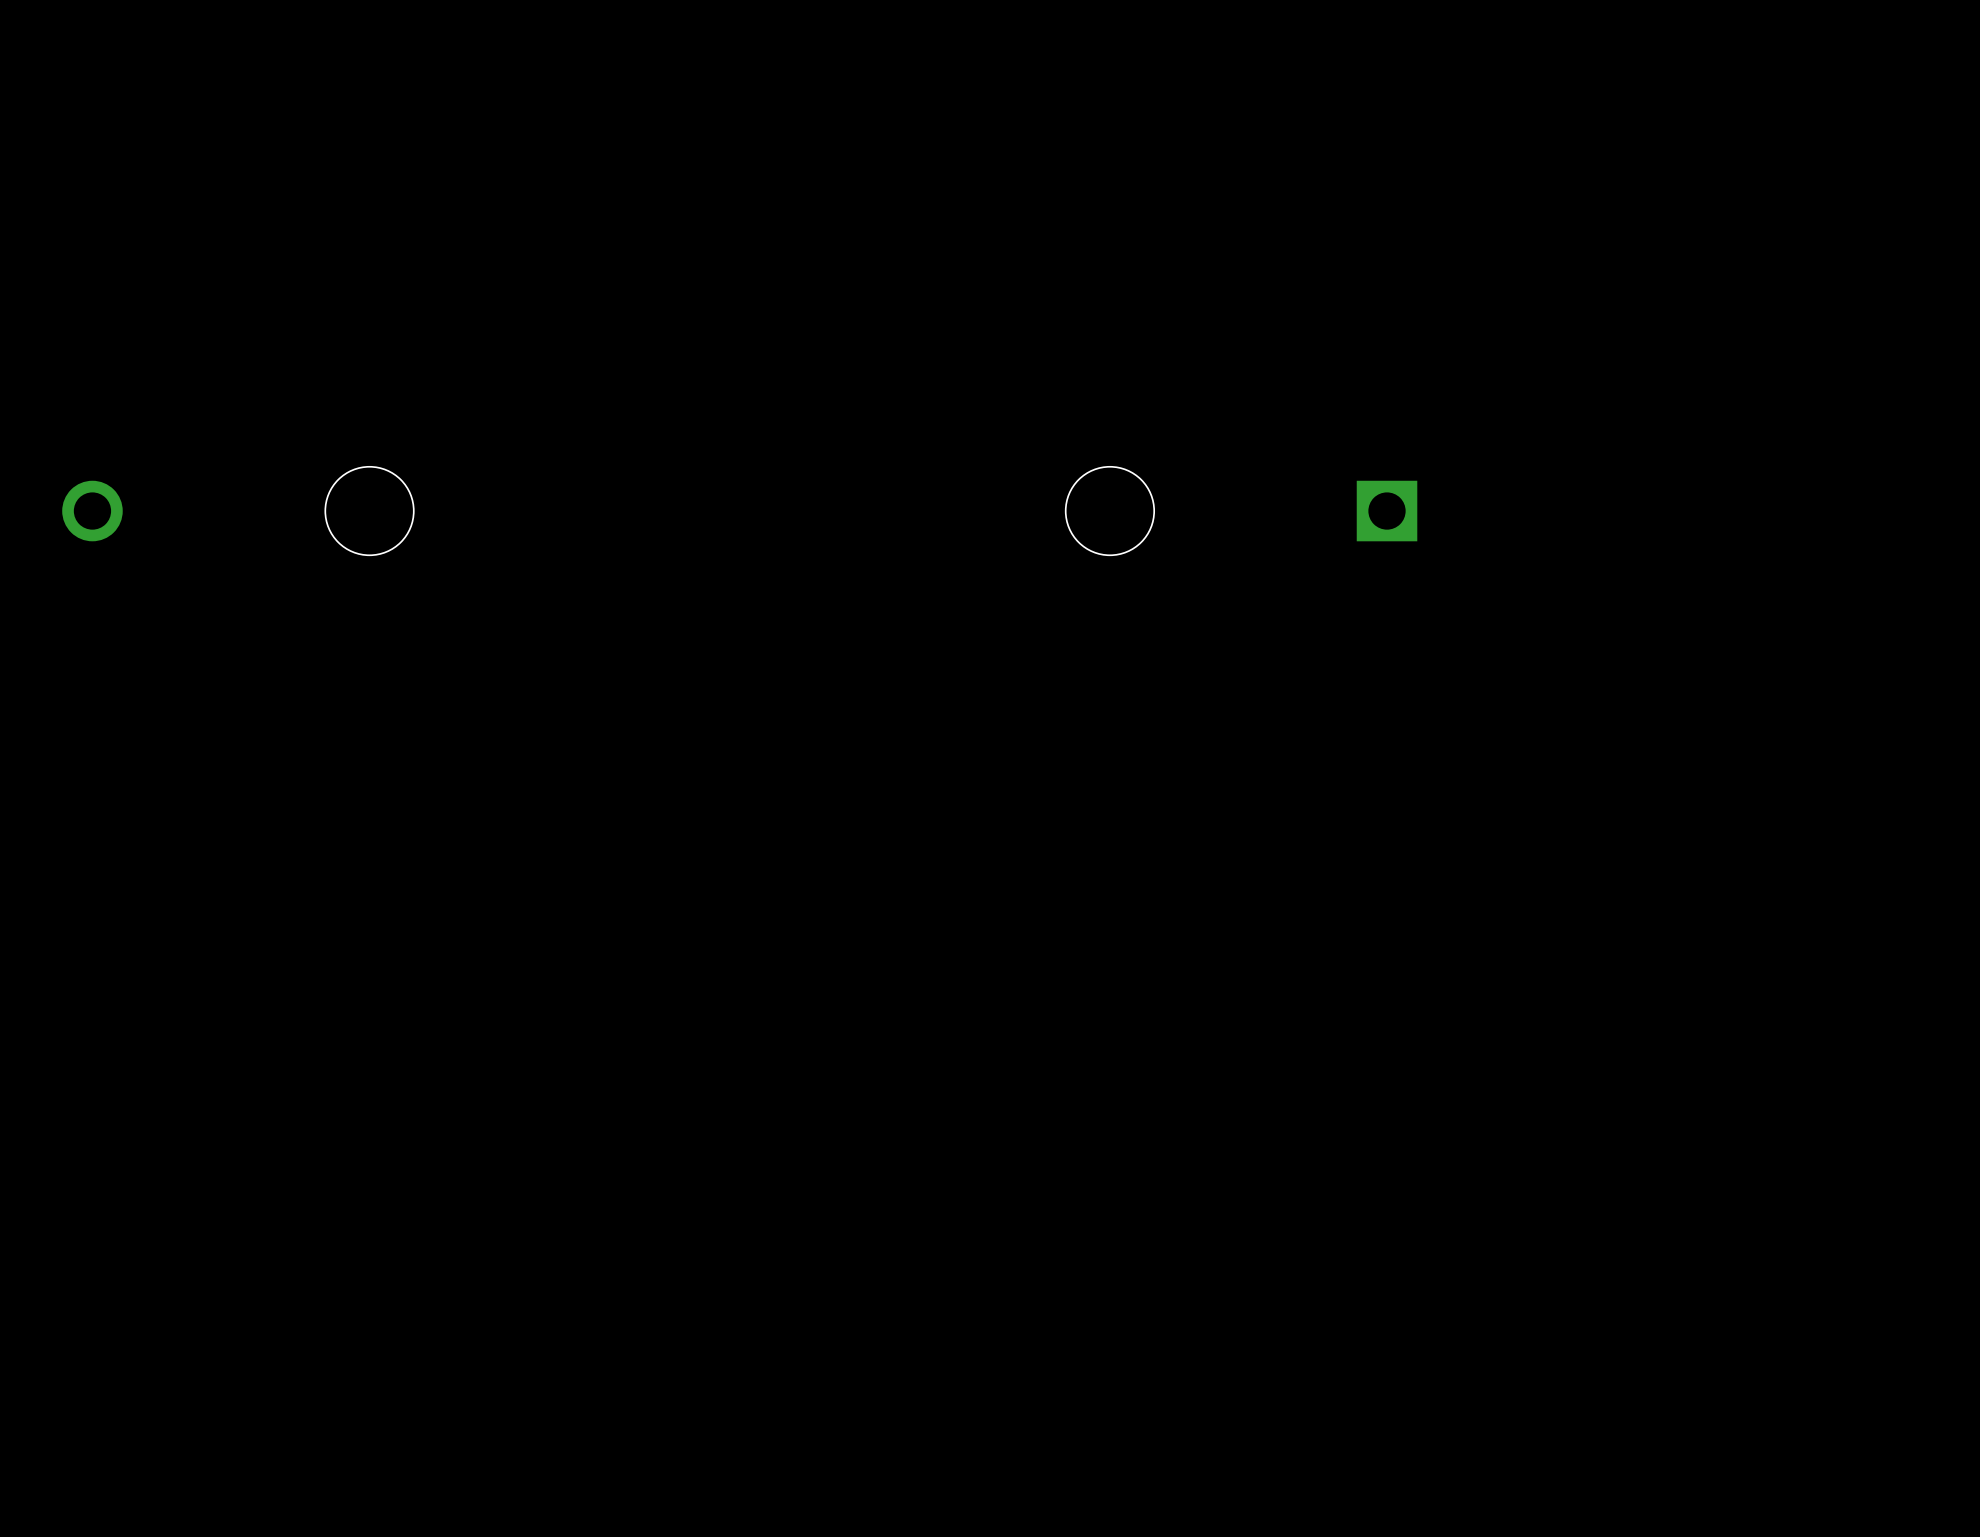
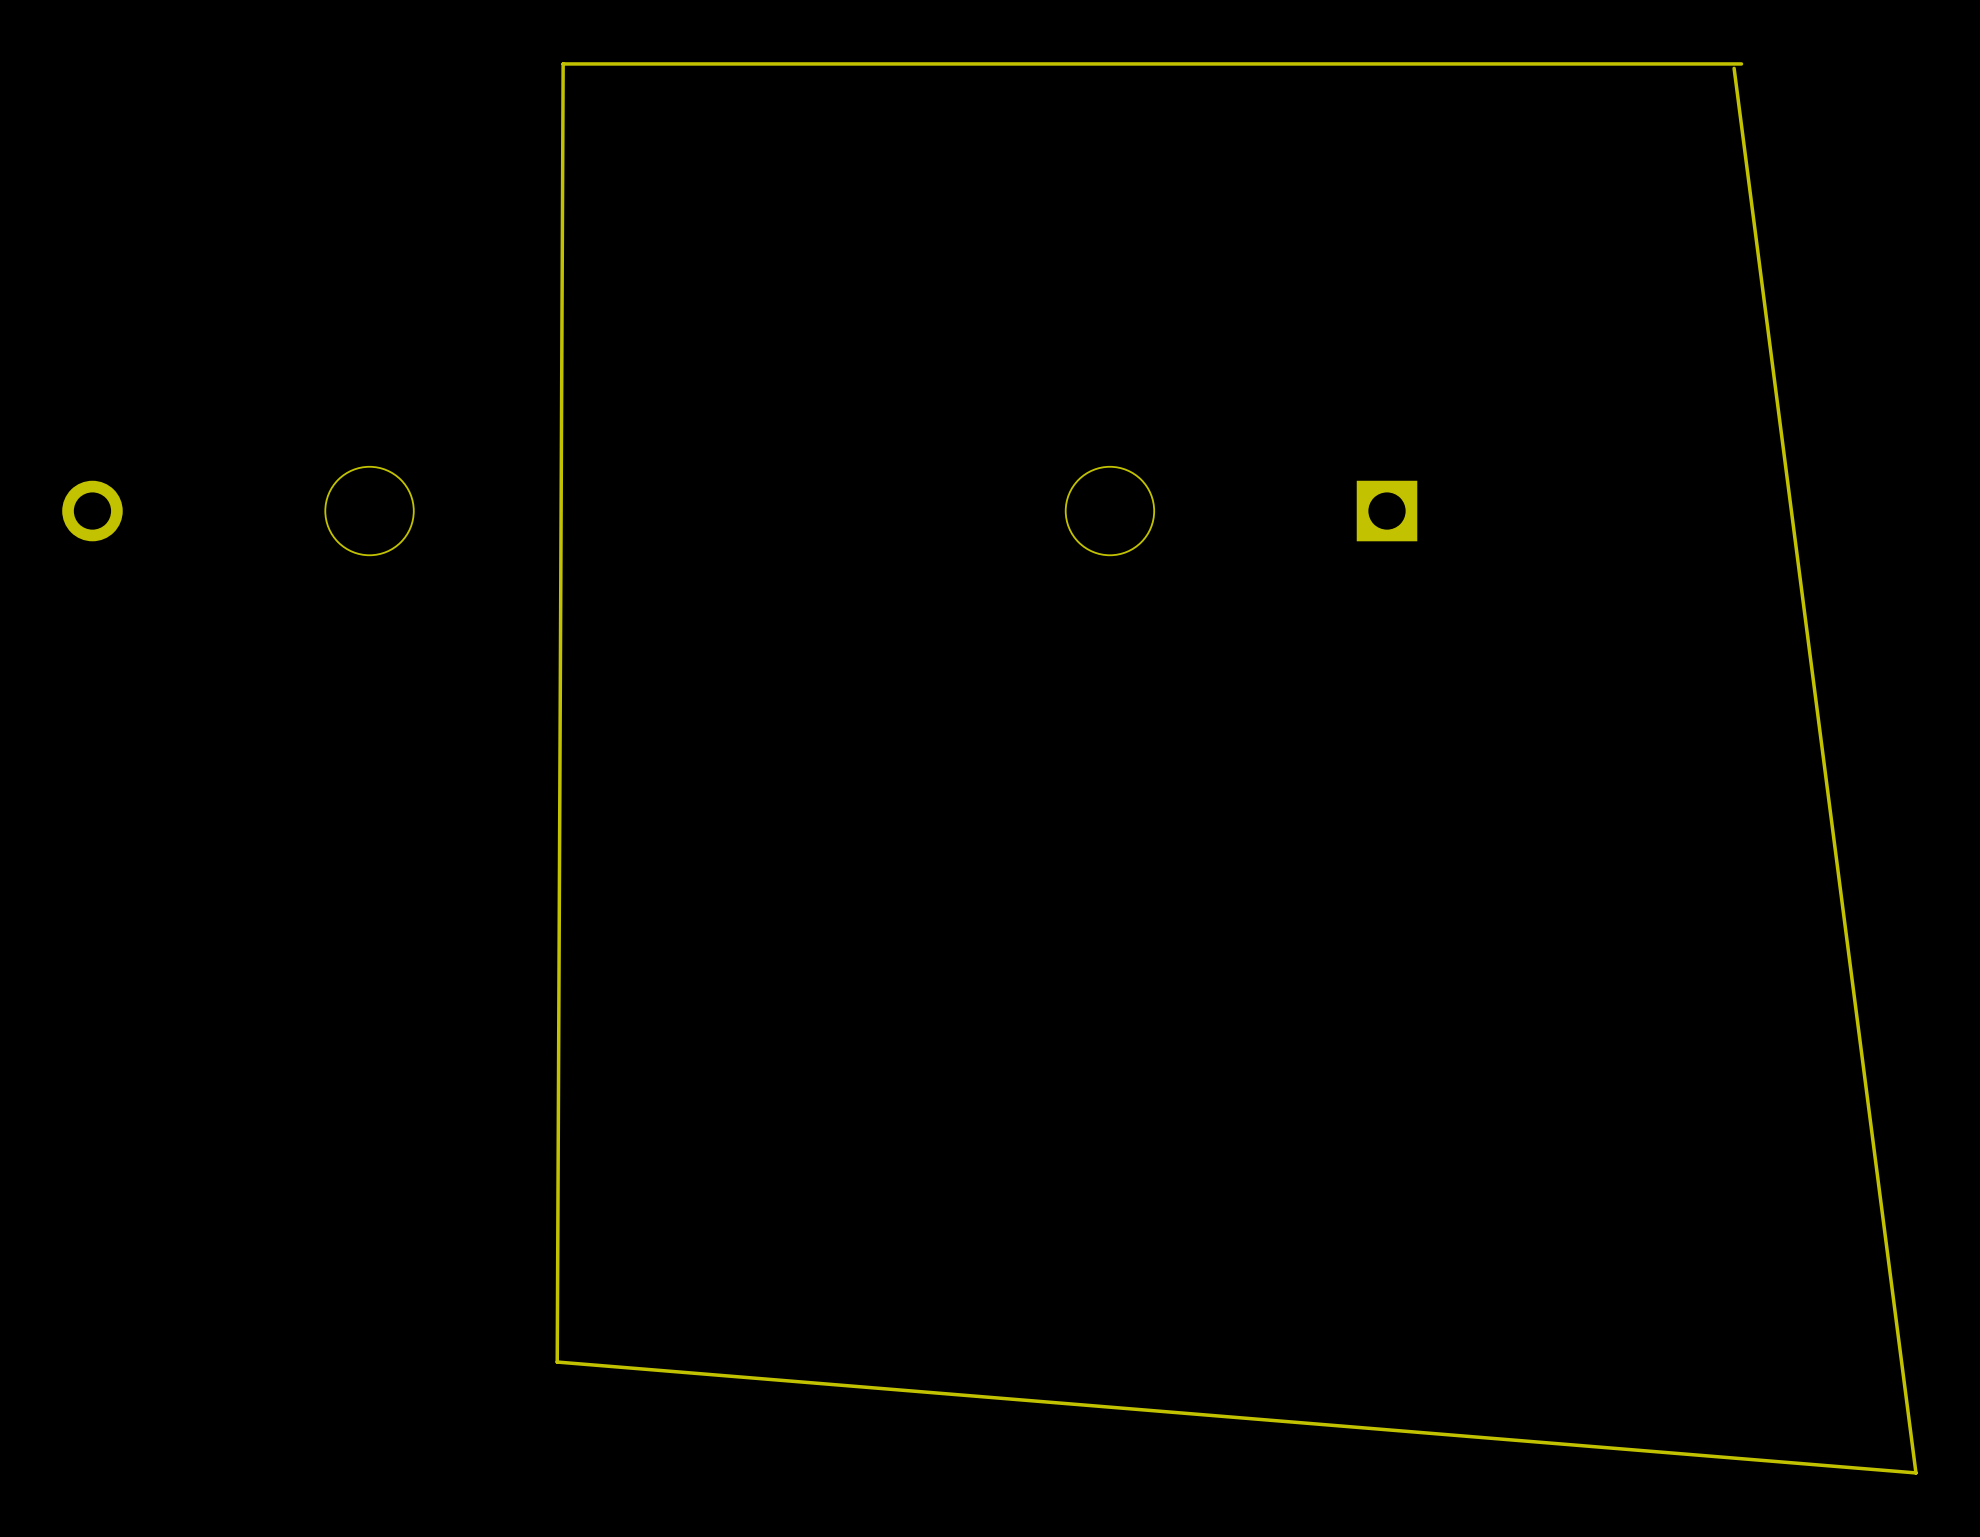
board edge: none -> (1741, 63) (563, 63) (557, 1362) (1915, 1472) (1734, 68)

